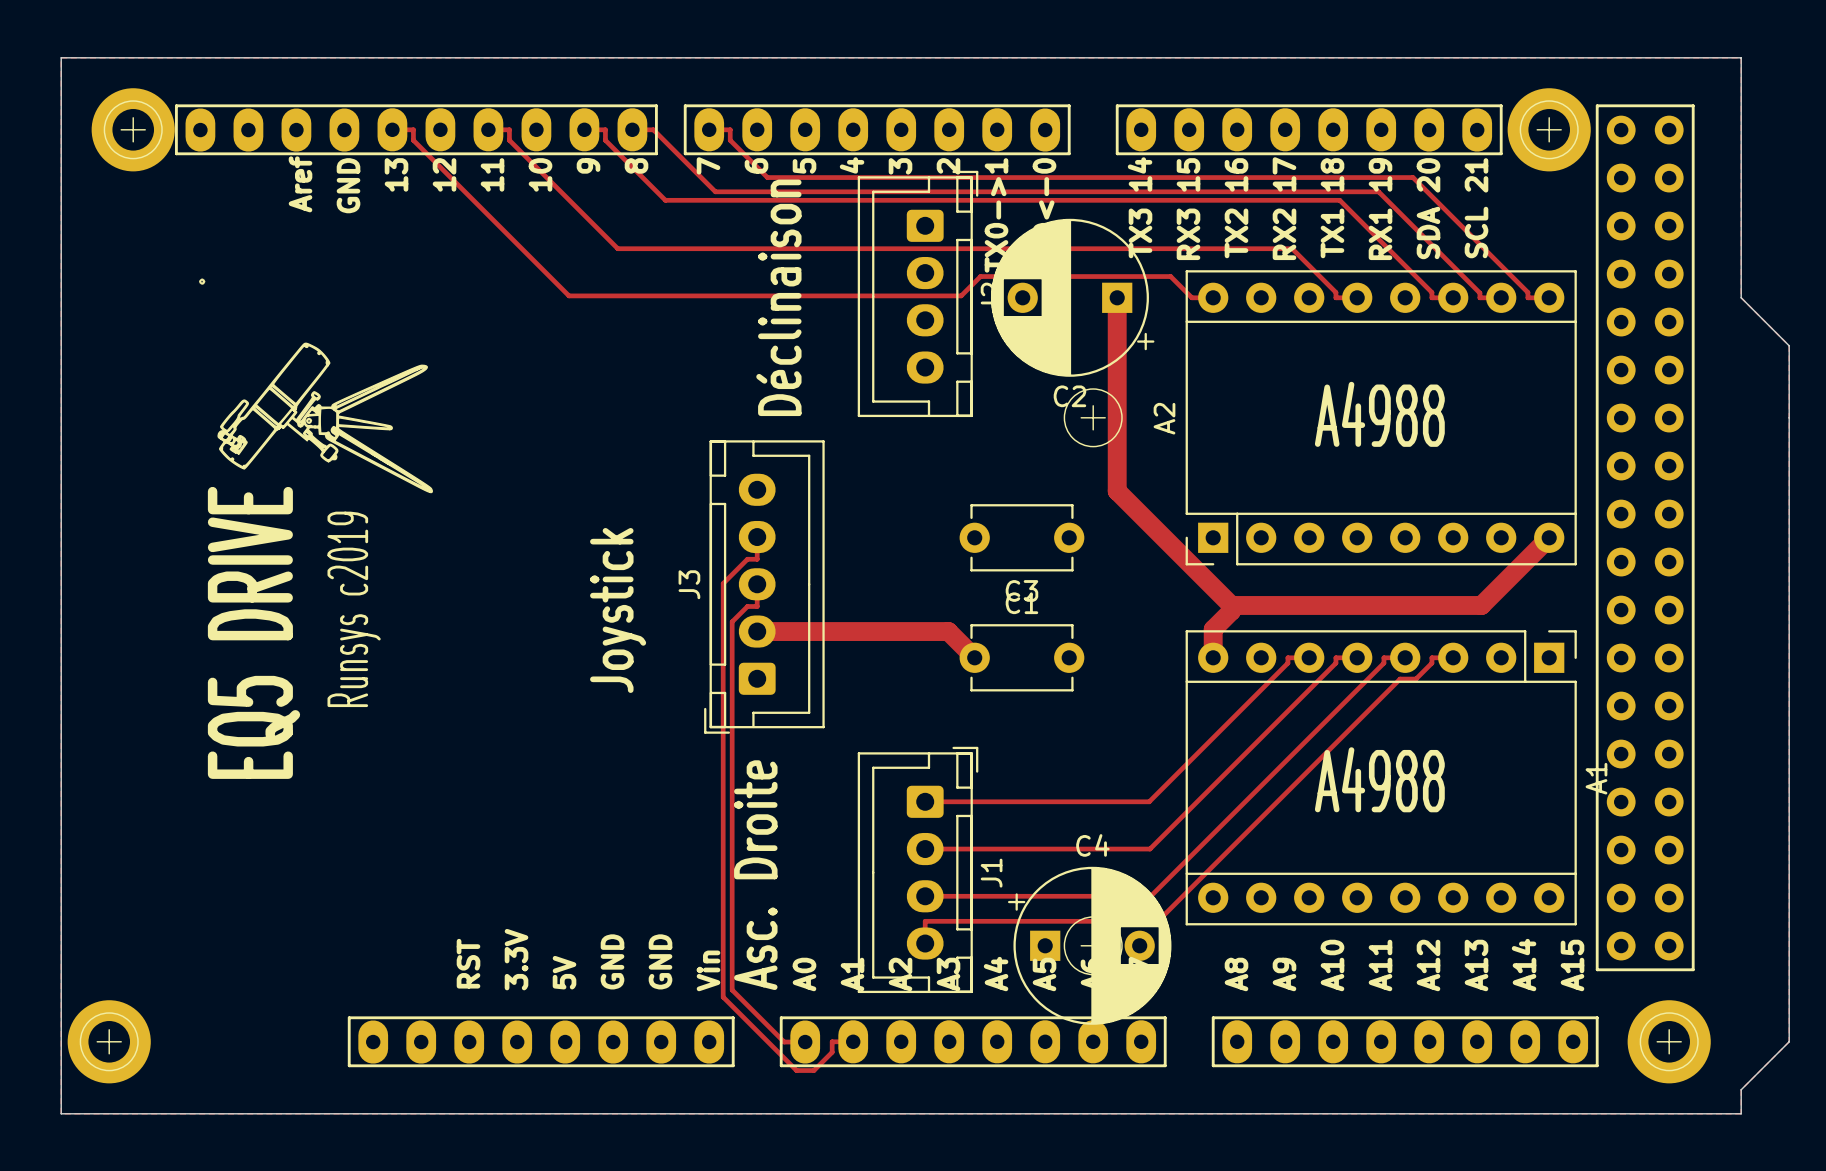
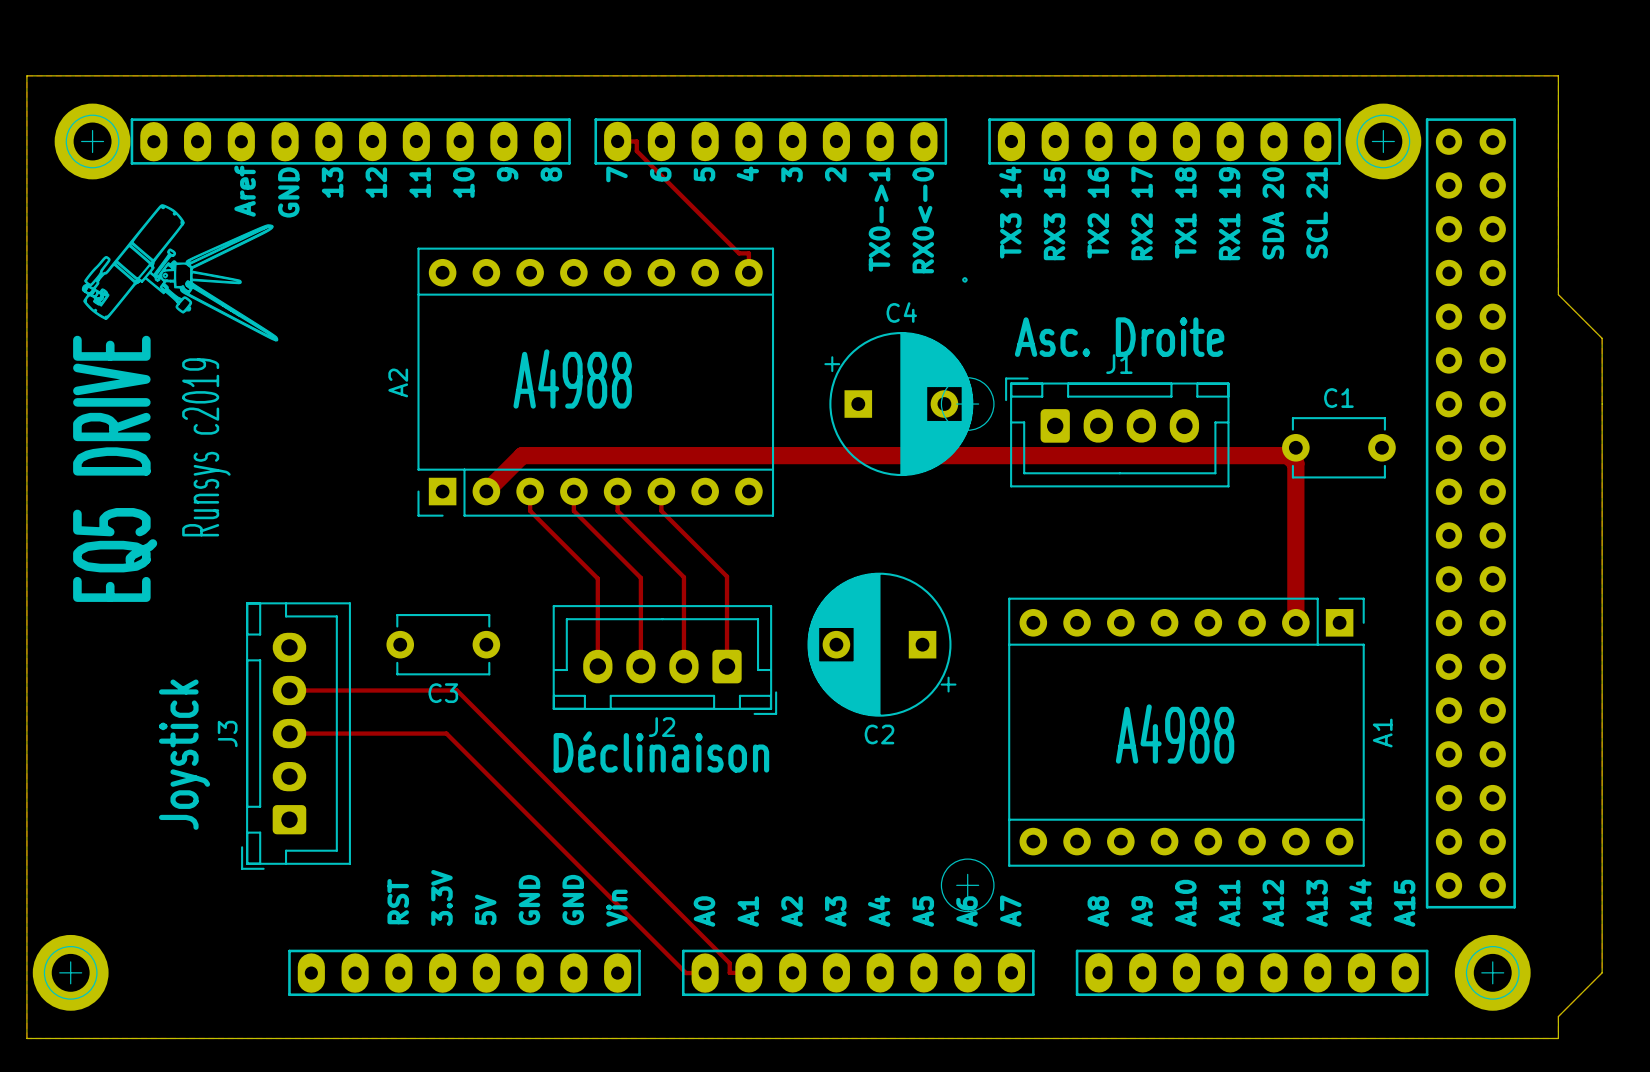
track: (392, 129) (413, 129) (413, 140) (569, 295) (961, 295) (980, 276) (1170, 276) (1191, 297) (1213, 297) -> none
track: (488, 129) (509, 129) (509, 140) (617, 248) (1292, 248) (1335, 292) (1335, 297) (1357, 297) -> none
track: (584, 129) (605, 129) (605, 140) (665, 200) (1339, 200) (1431, 292) (1431, 297) (1453, 297) -> none
track: (632, 129) (653, 129) (715, 191) (1378, 191) (1479, 293) (1479, 297) (1501, 297) -> none
track: (767, 177) (1413, 177) (1527, 292) (1527, 297) (1549, 297) -> (670, 185) (739, 253) (748, 253) (748, 272)
drawing: [199, 278, 206, 285] -> none
drawing: none -> [962, 277, 968, 283]
J2 rotation: 0° (918, 293) -> 90° clockwise (664, 660)
J2 position: (918, 293) -> (664, 660)
text: Déclinaison (778, 297) -> none
C2 position: (1072, 297) -> (881, 644)
track: (1117, 297) (1117, 491) (1231, 605) -> none
text: none -> Asc. Droite (1119, 337)
text: none -> A4988 (572, 378)
text: A4988 (1379, 414) -> none
drawing position: (325, 417) -> (180, 272)
A2 position: (1381, 417) -> (595, 382)
track: none -> (1288, 455) (522, 455) (486, 491)
track: none -> (530, 491) (530, 510) (597, 578) (597, 666)
track: none -> (573, 491) (573, 510) (640, 577) (640, 666)
track: none -> (617, 491) (617, 510) (683, 577) (683, 666)
track: none -> (661, 491) (661, 510) (727, 576) (727, 666)
track: (757, 537) (757, 559) (747, 559) (723, 583) (723, 997) (796, 1070) (813, 1070) (832, 1052) (832, 1041) -> (289, 690) (456, 690) (729, 963) (729, 972)
C3 position: (1021, 537) -> (443, 644)
track: (1549, 537) (1481, 605) (1231, 605) -> none
track: (757, 584) (757, 606) (747, 606) (732, 621) (732, 990) -> (289, 733) (446, 733) (638, 925)
J3 position: (764, 587) -> (296, 736)
track: (1231, 605) (1231, 611) (1213, 629) (1213, 657) -> none
text position: Runsys c2019 (354, 609) -> Runsys c2019 (206, 447)
text position: Joystick (618, 610) -> Joystick (184, 754)
track: (757, 631) (948, 631) (974, 657) -> none
text position: EQ5 DRIVE (253, 632) -> EQ5 DRIVE (115, 468)
C1 position: (1021, 657) -> (1338, 447)
track: (1309, 657) (1287, 657) (1287, 663) (1149, 801) (925, 801) -> none
track: (1357, 657) (1335, 657) (1335, 663) (1150, 849) (925, 849) -> none
track: (1405, 657) (1383, 657) (1383, 663) (1150, 896) (925, 896) -> none
track: (1453, 657) (1431, 657) (1431, 663) (1415, 679) (1400, 679) (1157, 921) (925, 921) (925, 943) -> (1295, 622) (1295, 463) (1288, 455)
A1 position: (1381, 777) -> (1186, 732)
text position: A4988 (1379, 779) -> A4988 (1175, 733)
text: none -> Déclinaison (661, 751)
J1 rotation: 0° (918, 869) -> 90° counterclockwise (1117, 432)
J1 position: (918, 869) -> (1117, 432)
text: Asc. Droite (755, 875) -> none
C4 position: (1089, 945) -> (898, 404)

